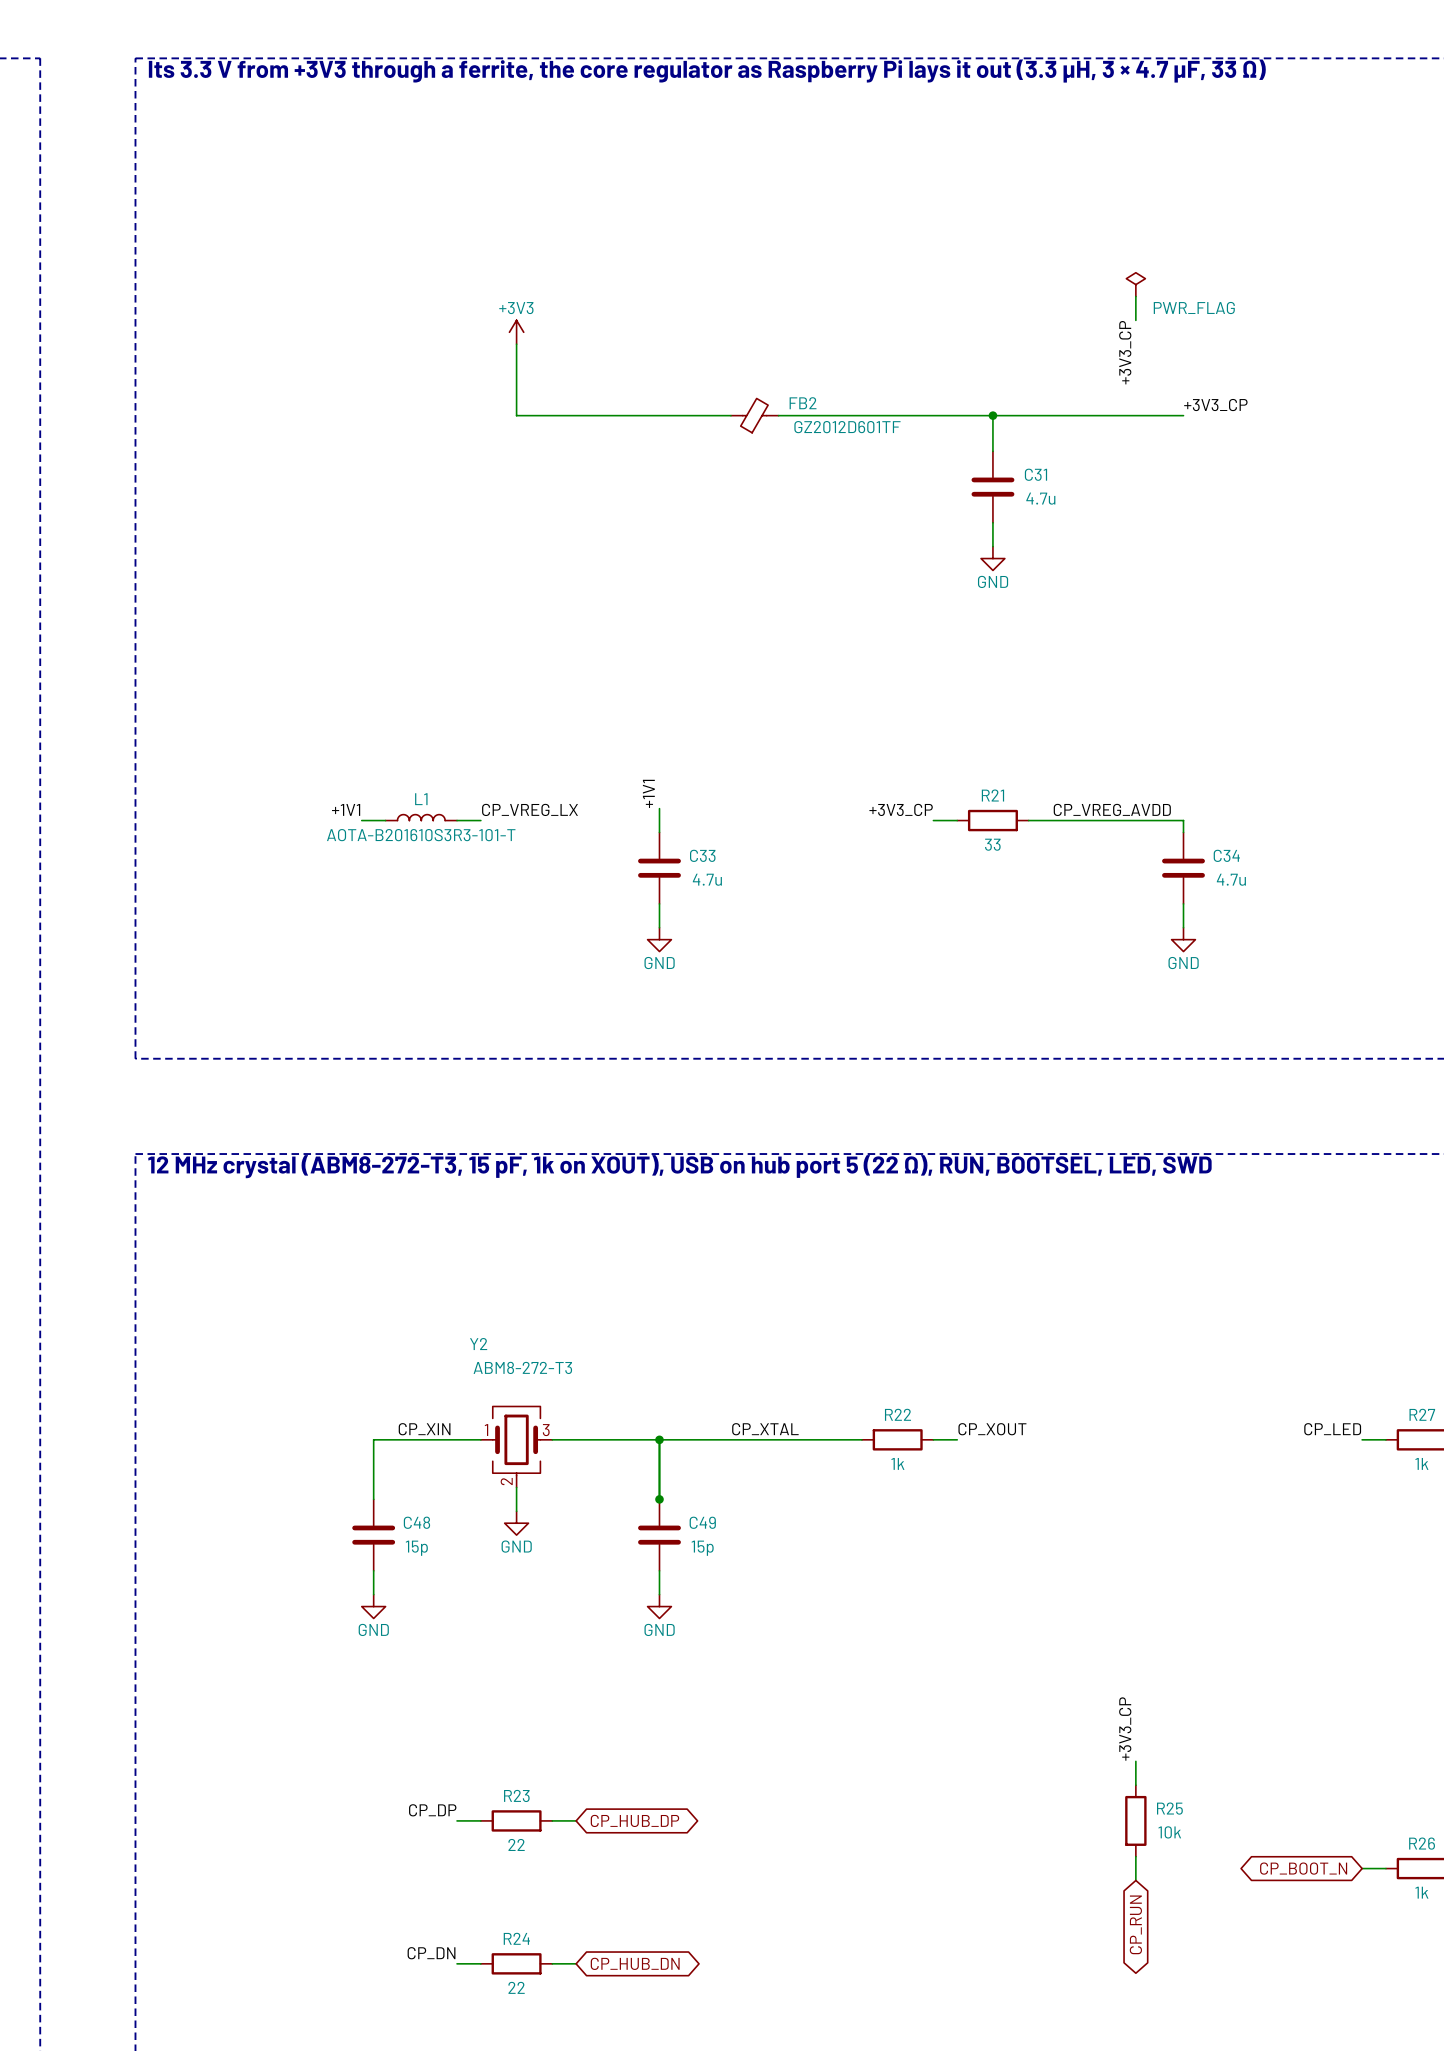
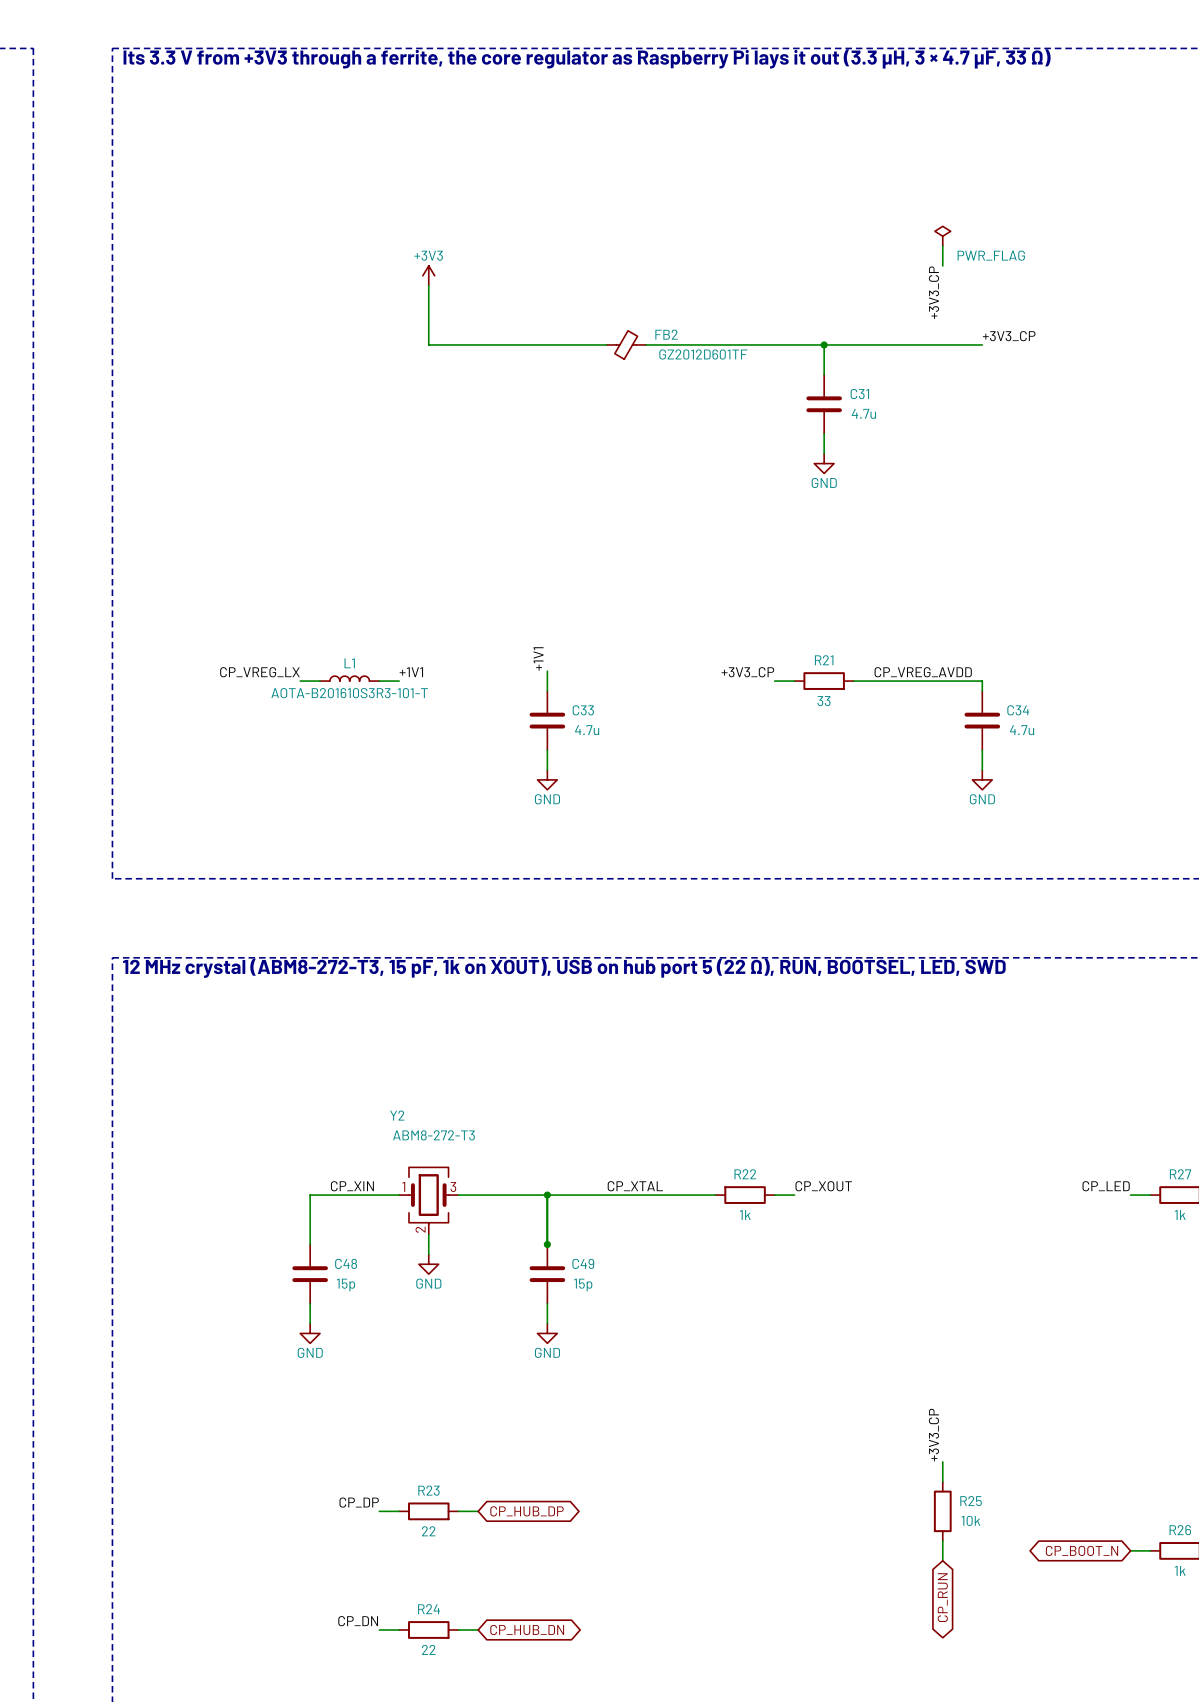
label: +1V1 (346, 809) -> CP_VREG_LX (259, 672)
label: CP_VREG_LX (530, 809) -> +1V1 (411, 672)

